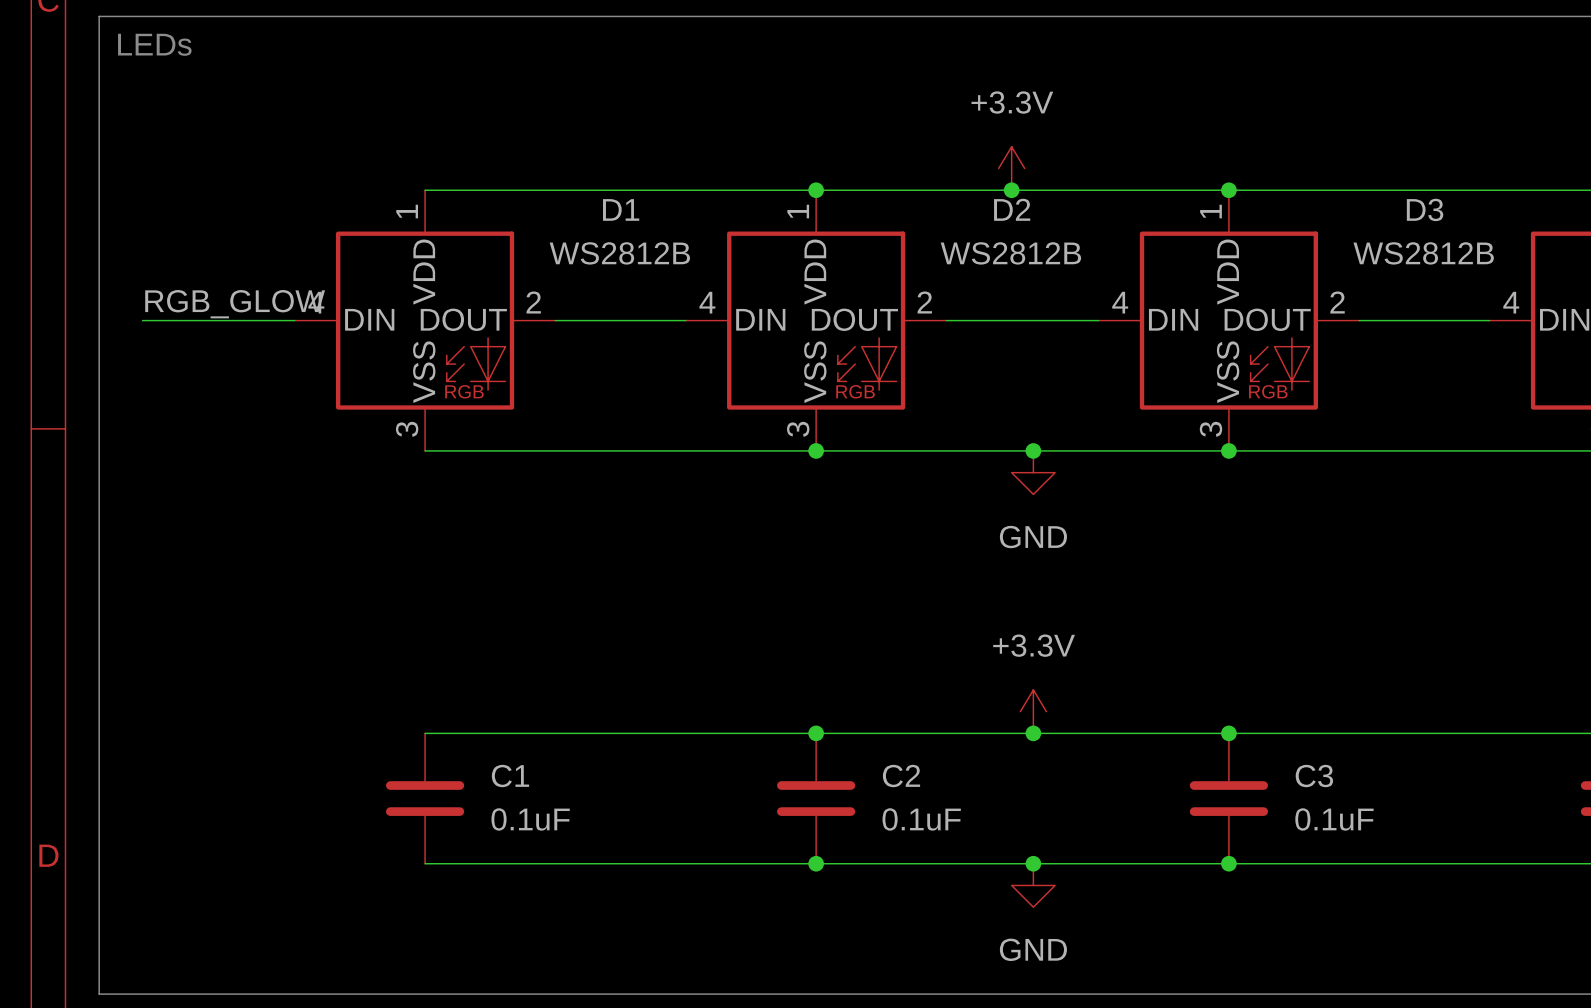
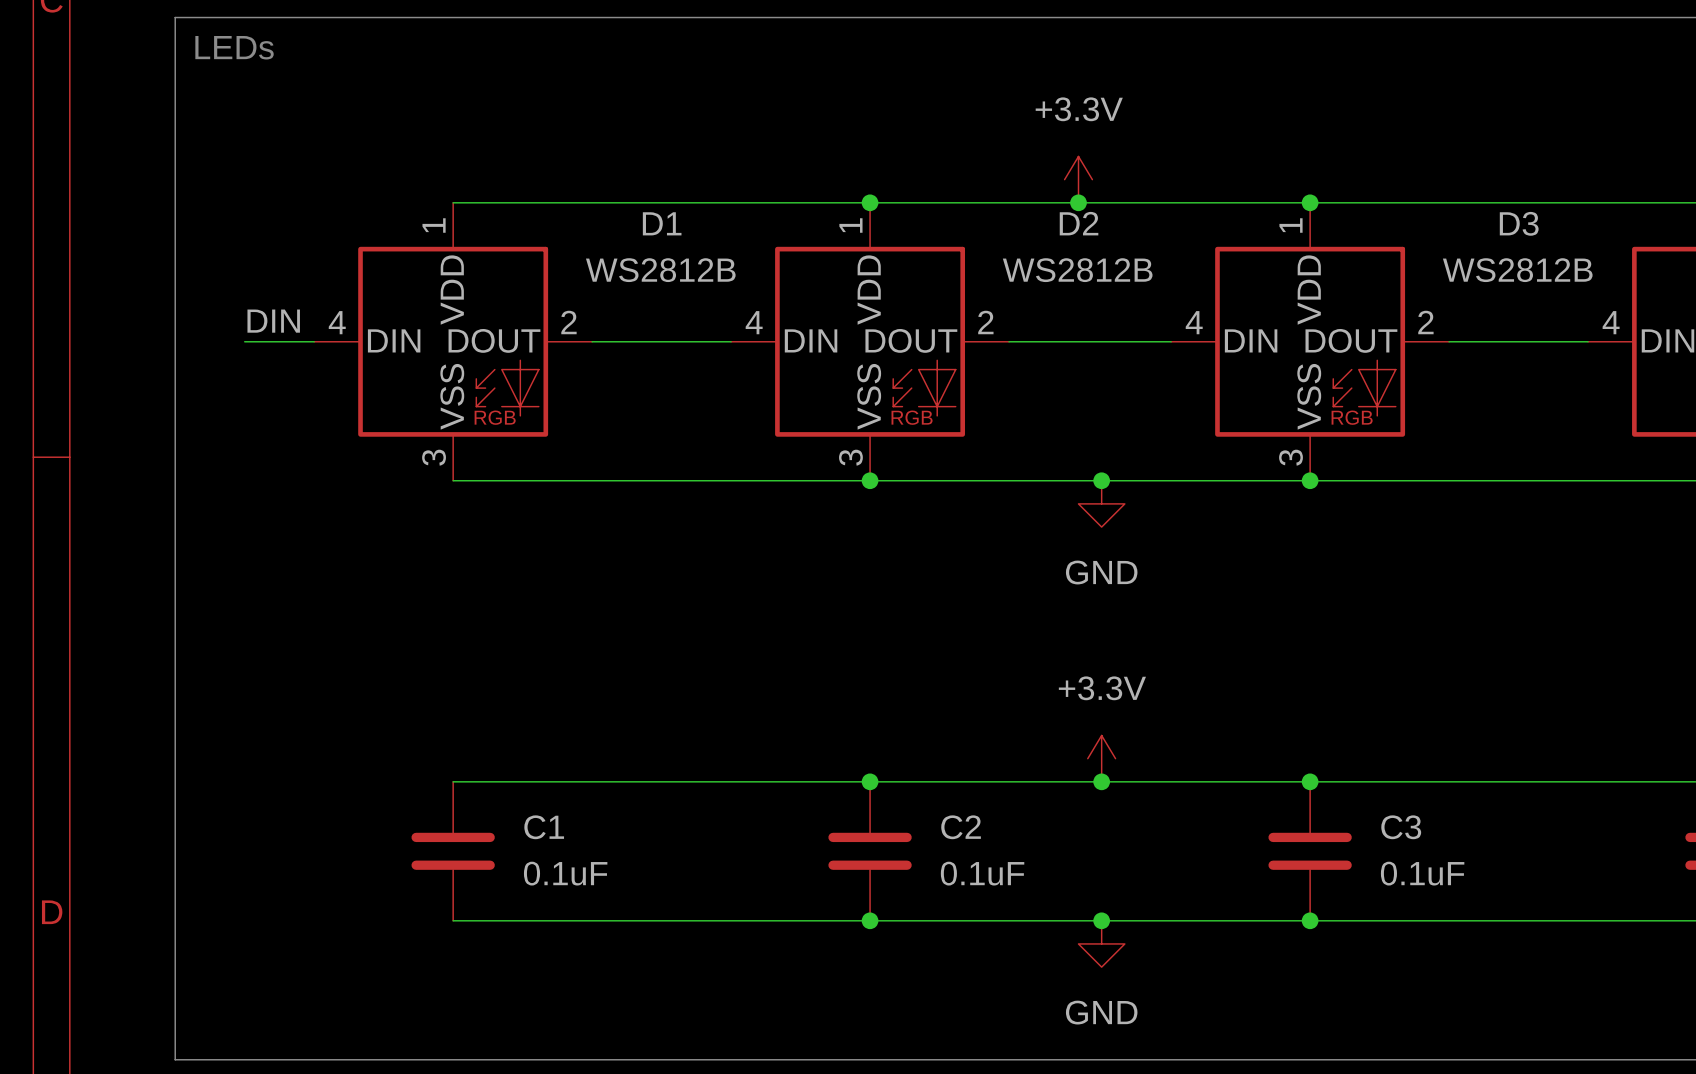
line: (164, 16) (99, 16) (99, 994) (164, 994) -> (175, 17) (175, 1059)
text position: LEDs (154, 44) -> LEDs (234, 47)
label: none -> DIN (273, 321)
label: RGB_GLOW (235, 304) -> none
wire: (142, 320) (229, 320) -> none

